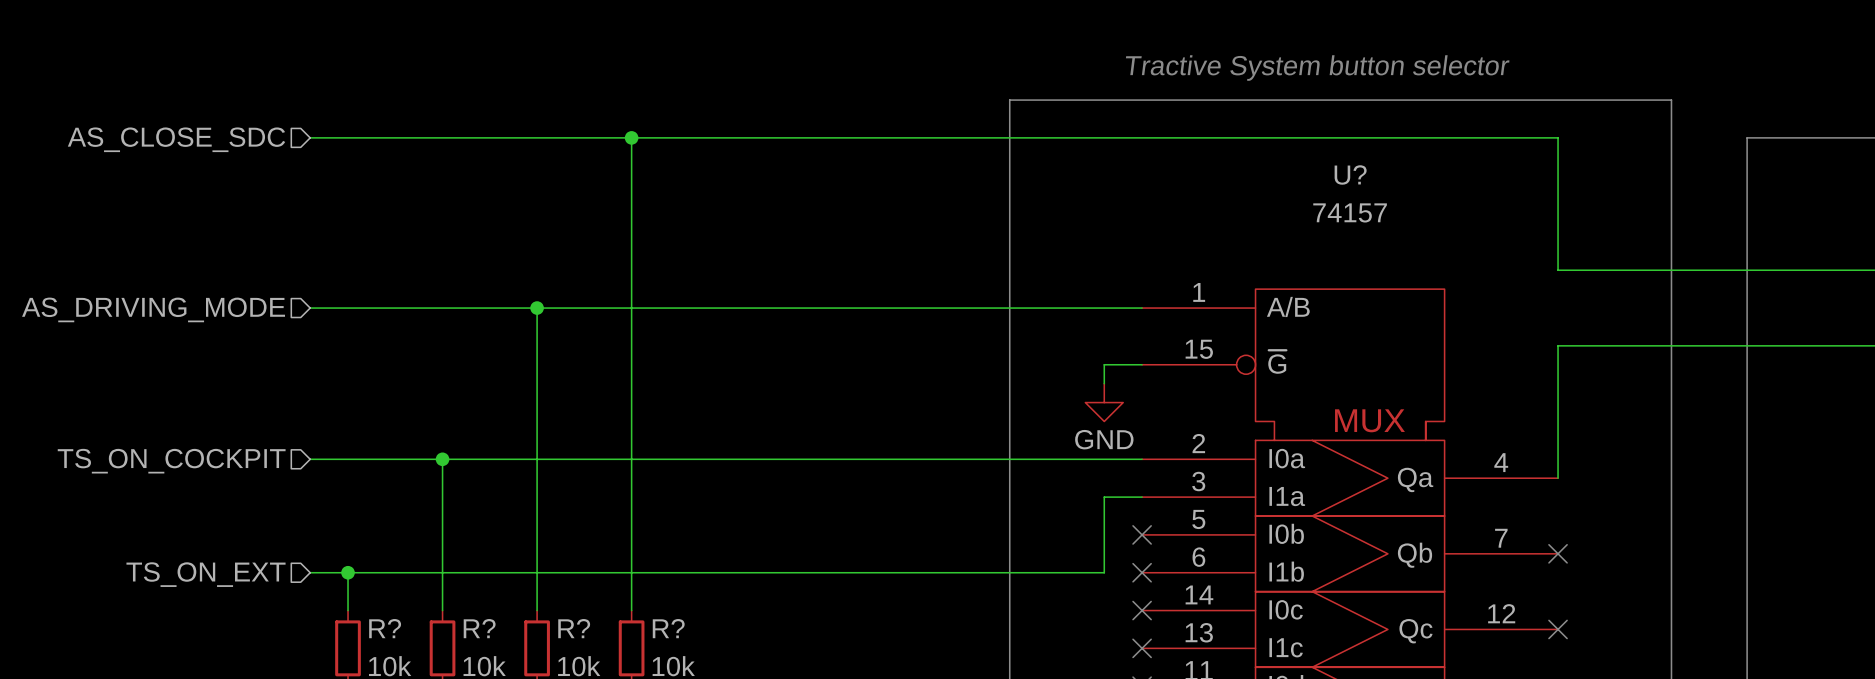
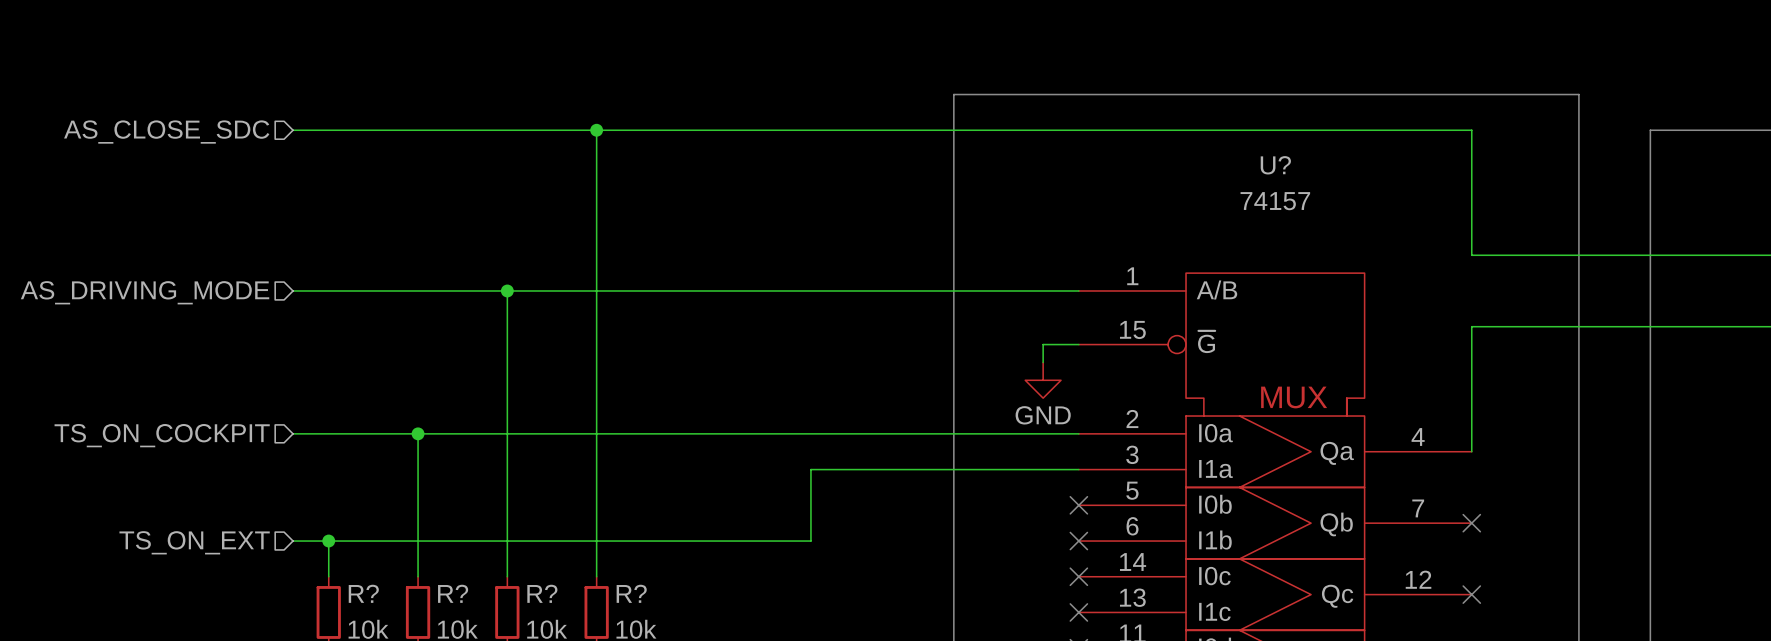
text: Tractive System button selector (1317, 68) -> none
wire: (1104, 497) (1104, 572) (858, 572) -> (1043, 469) (810, 469) (810, 541)

